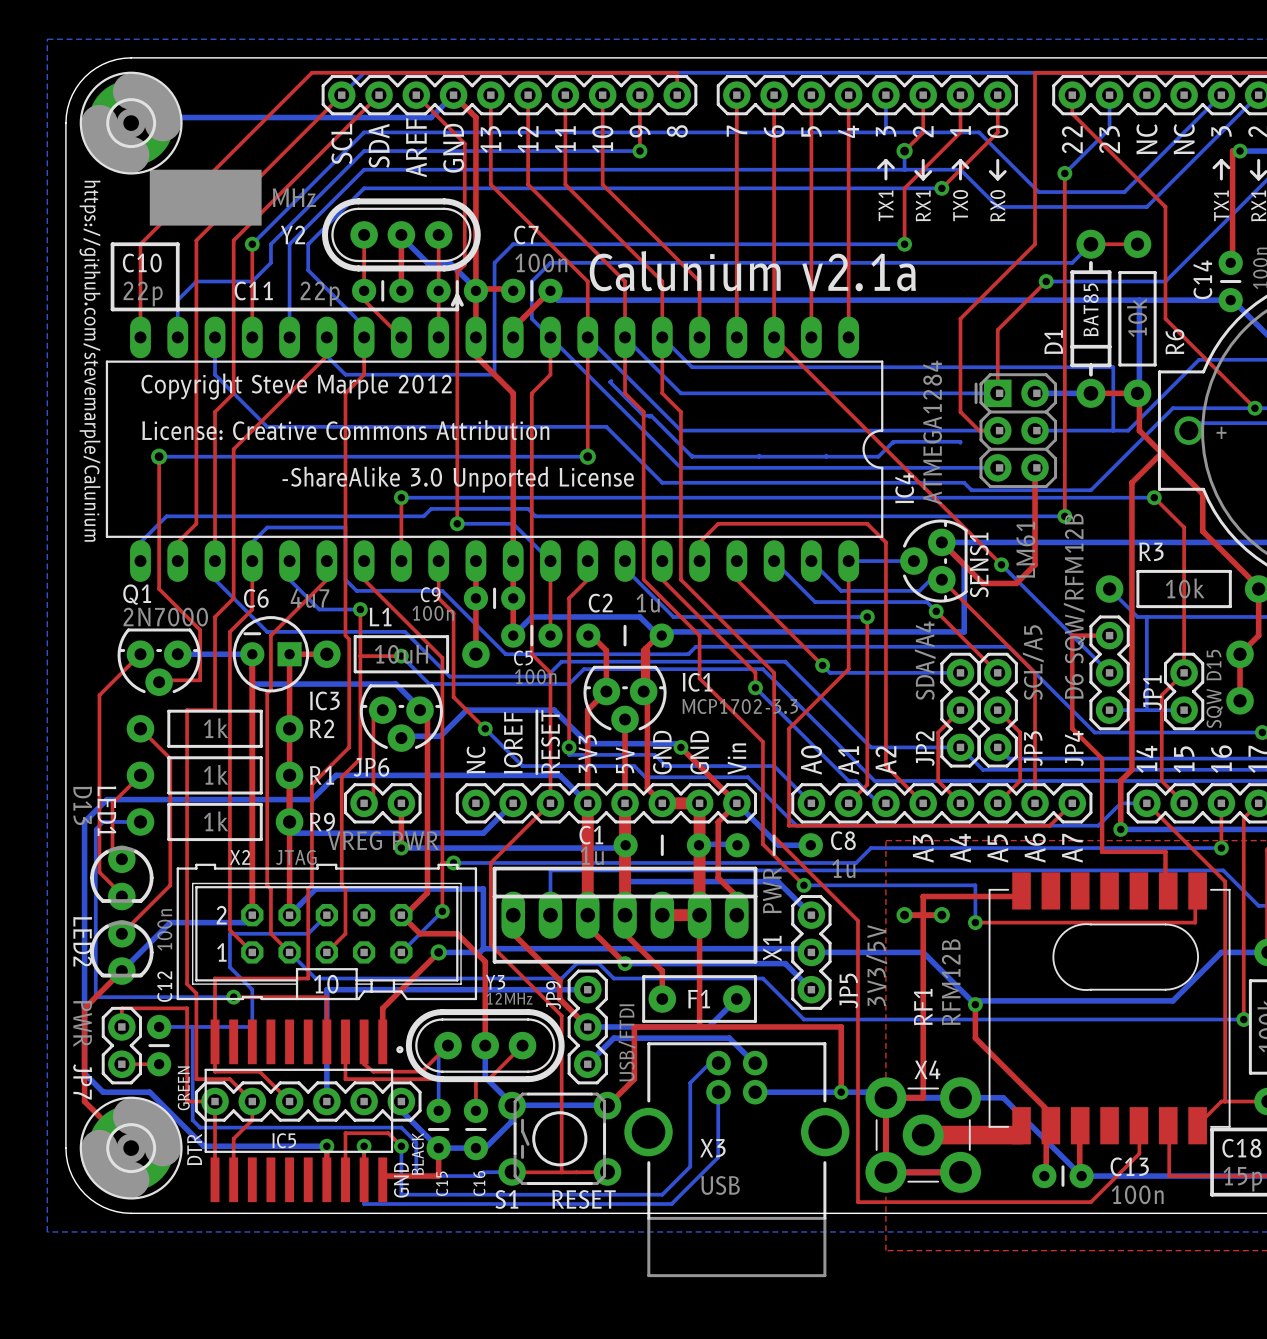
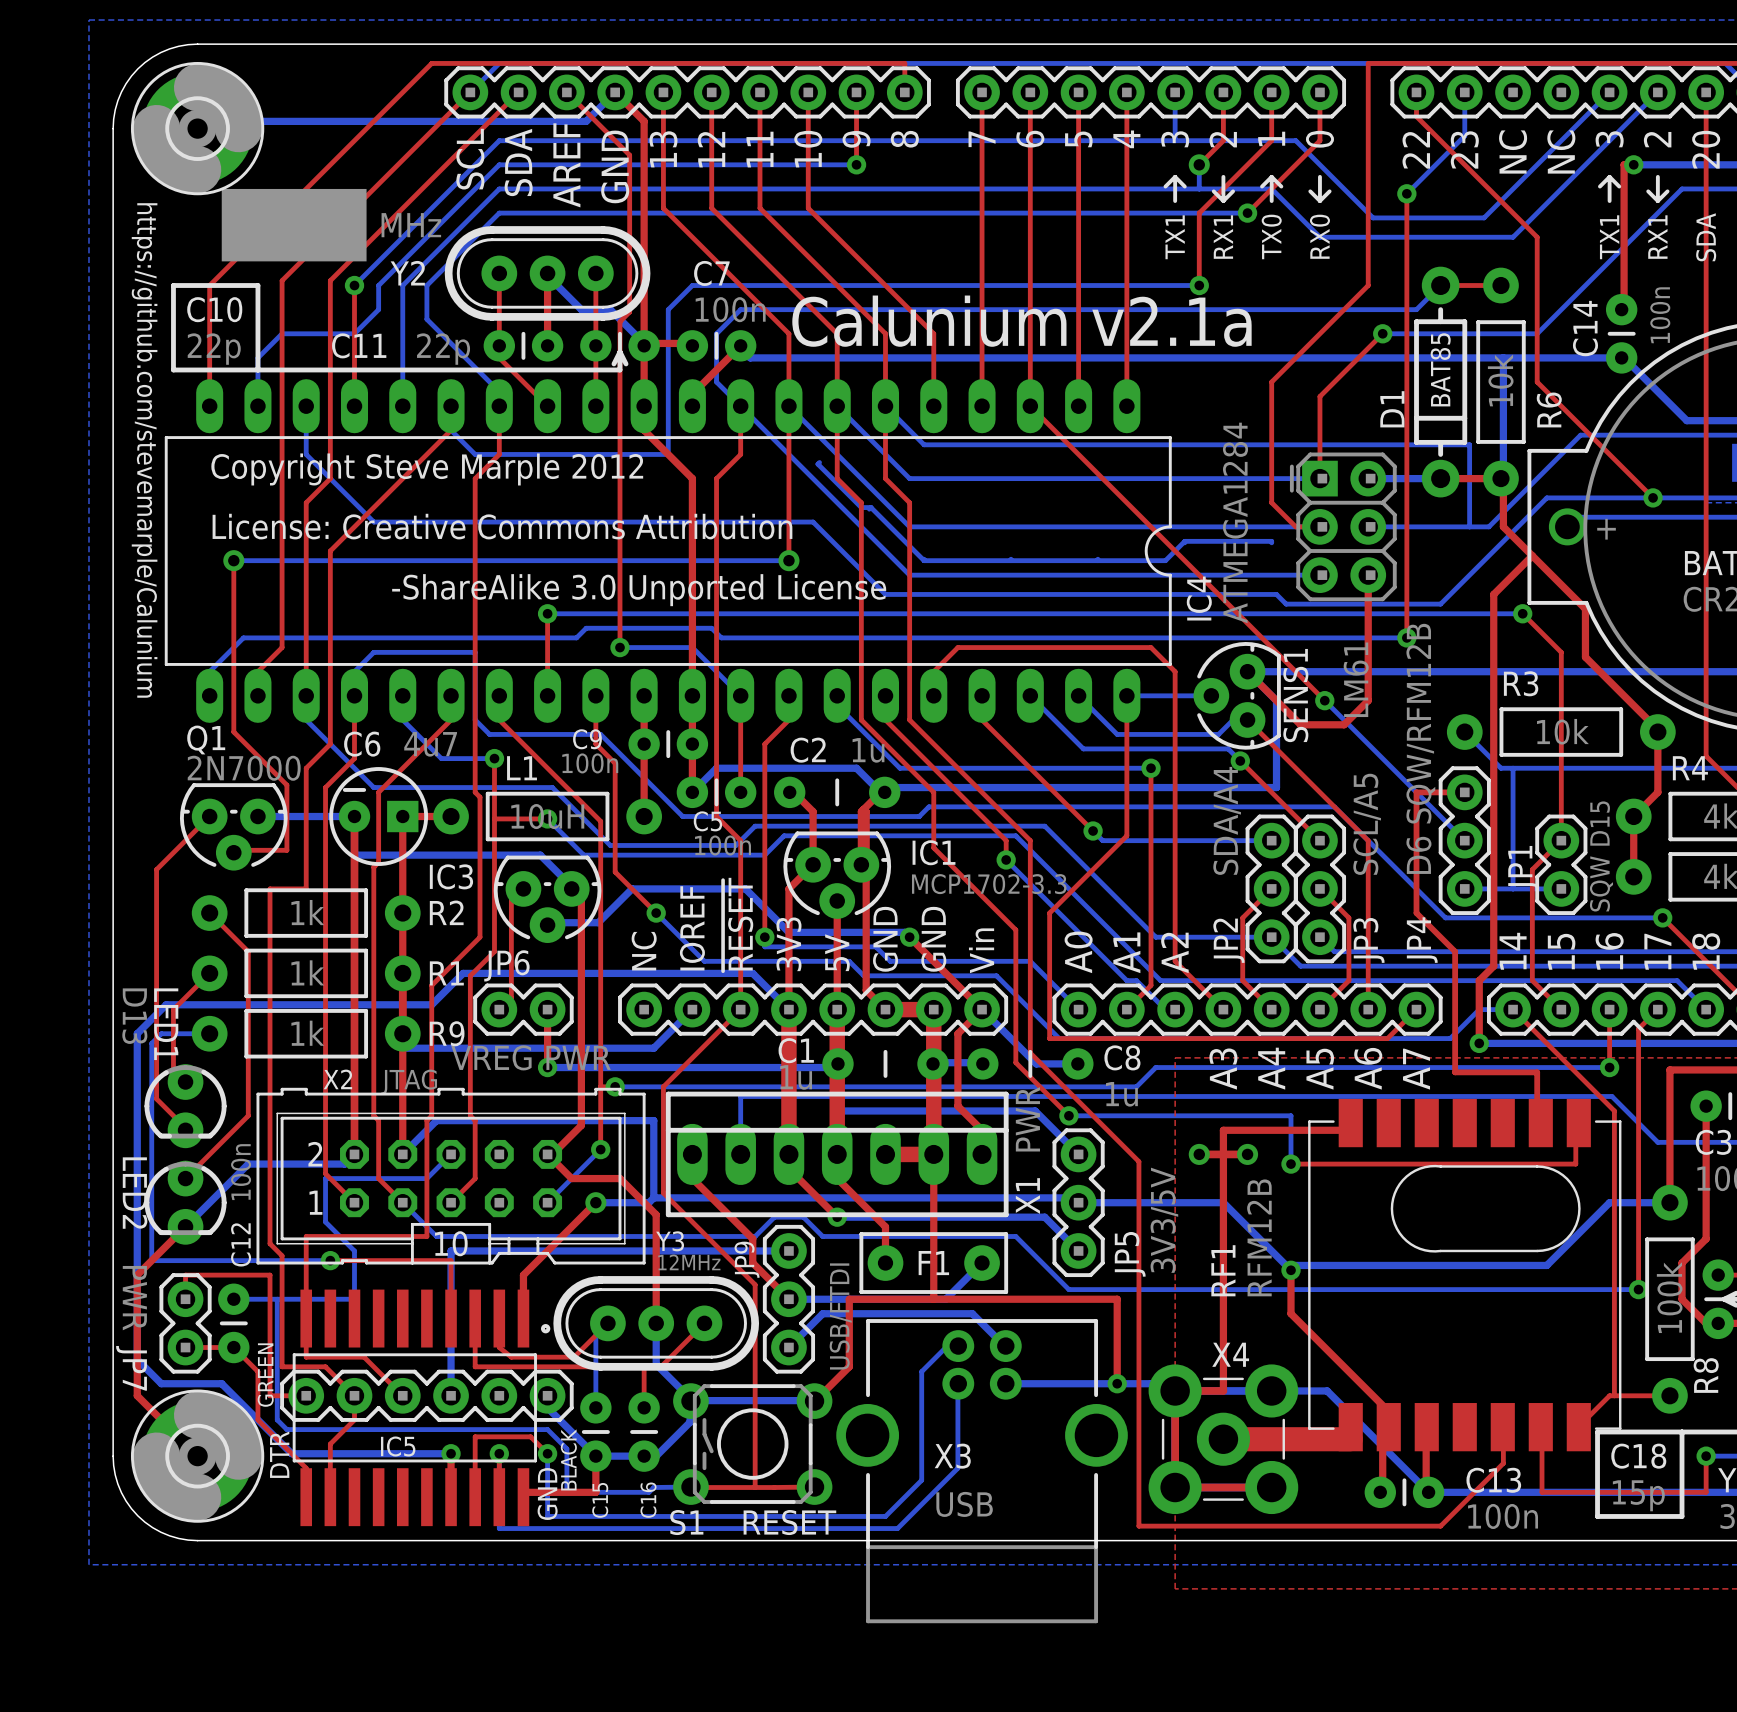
top track: (215, 1101) (215, 1157) -> (233, 1347) (257, 1371) (257, 1419) (306, 1468)

